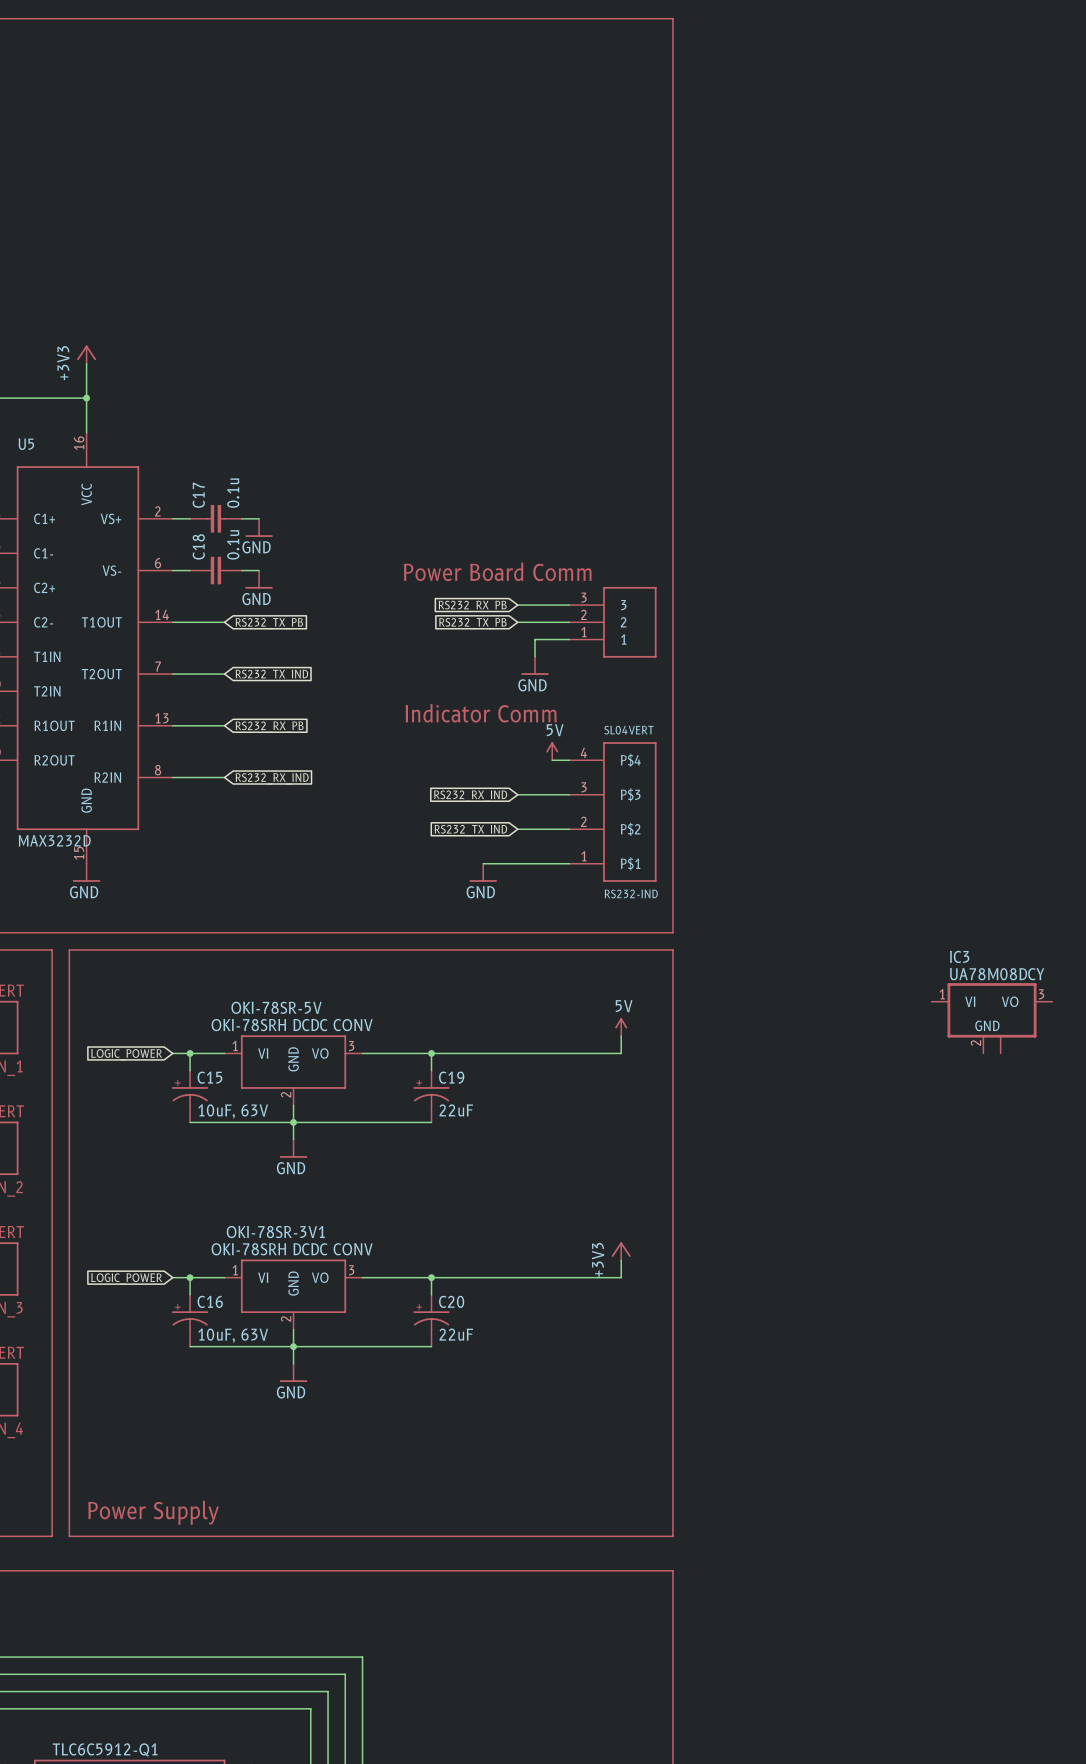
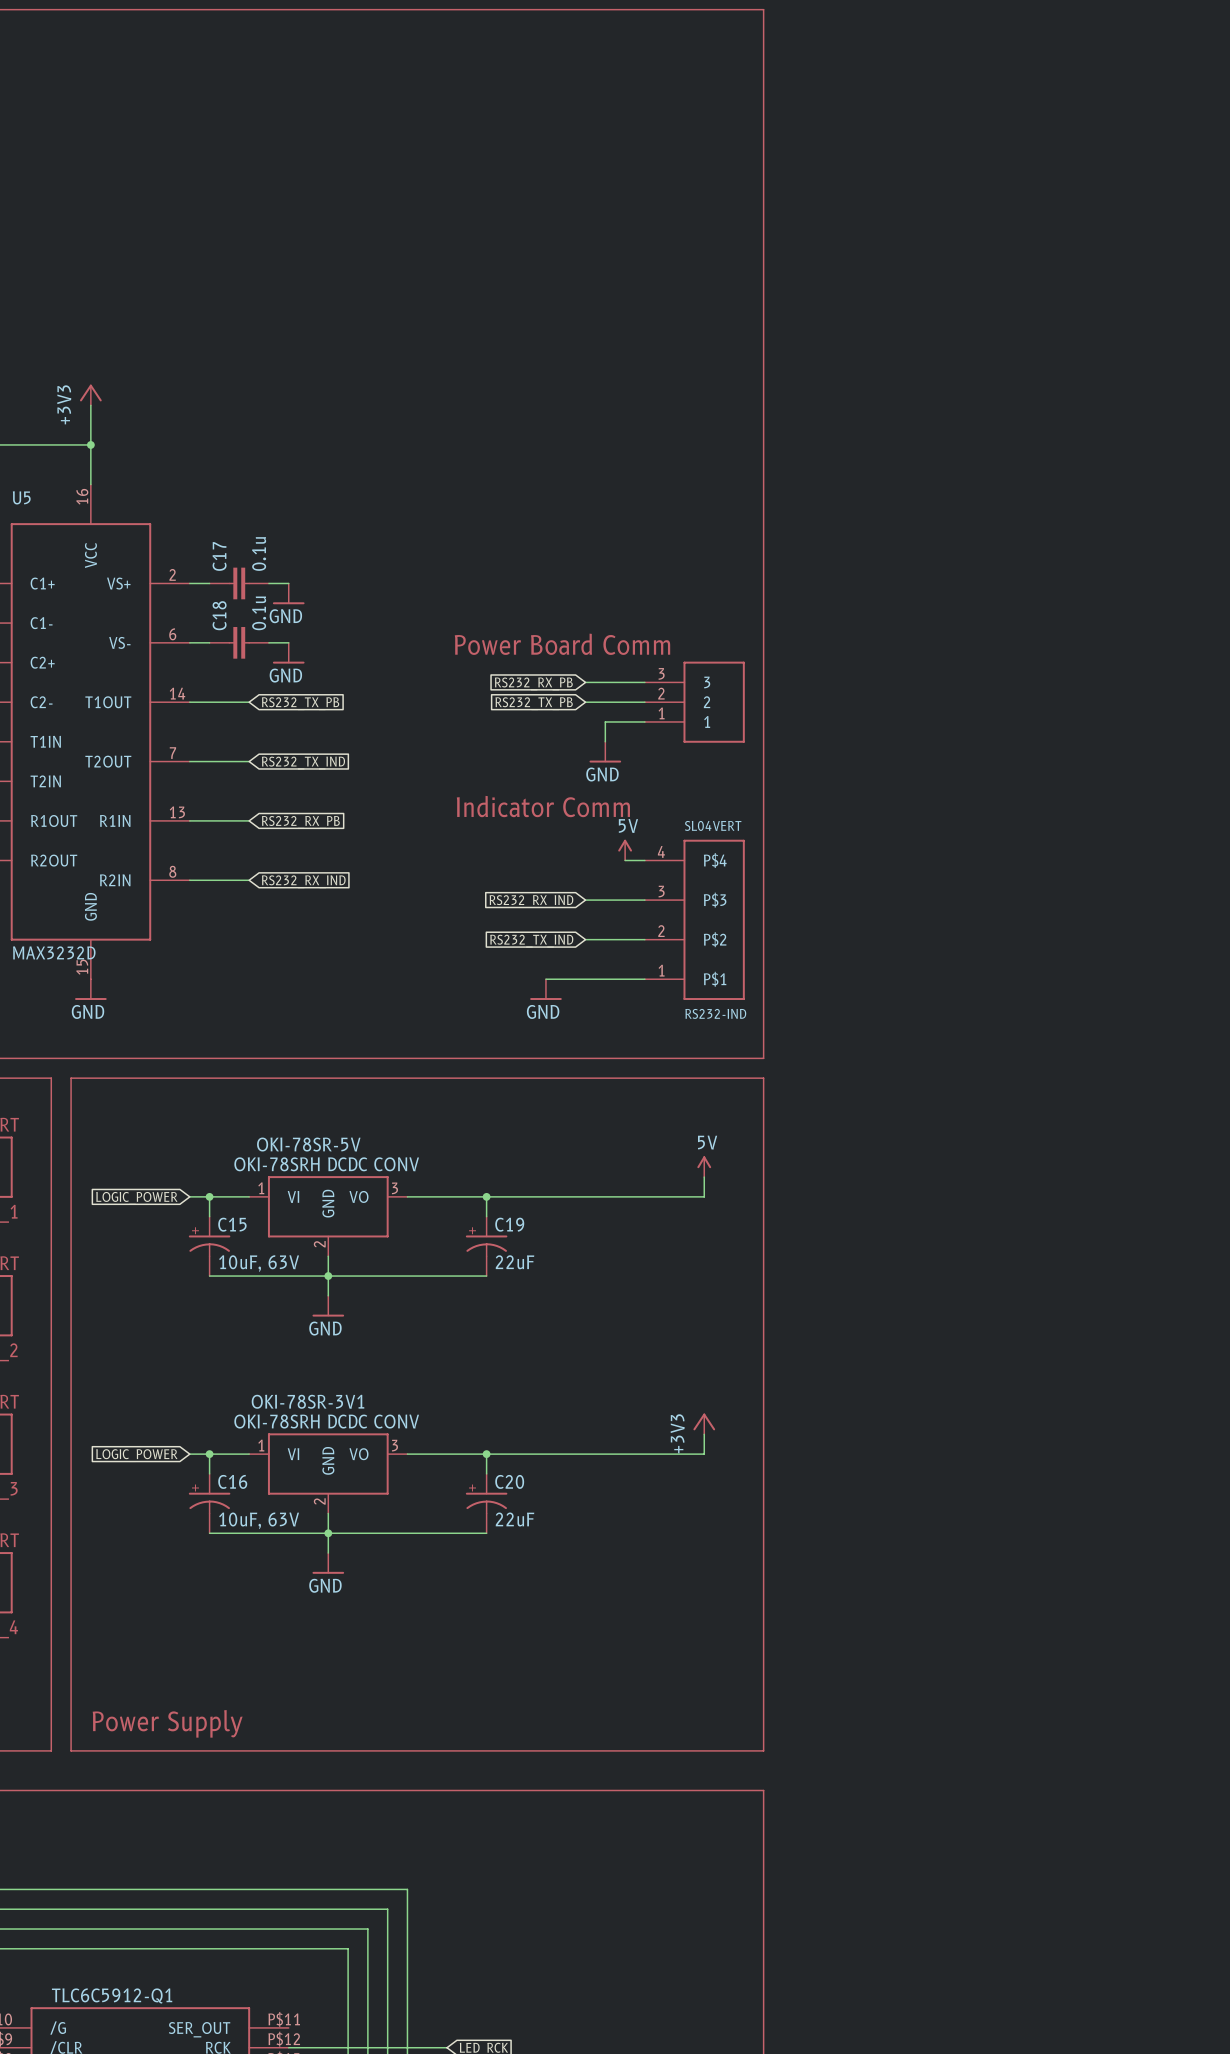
IC3: UA78M08DCY (992, 1018) -> none

